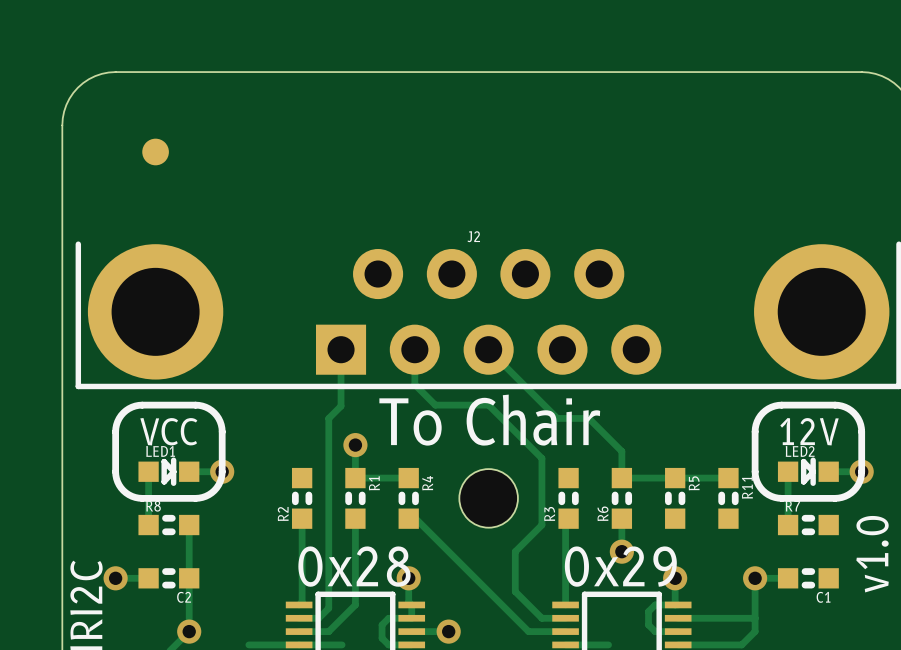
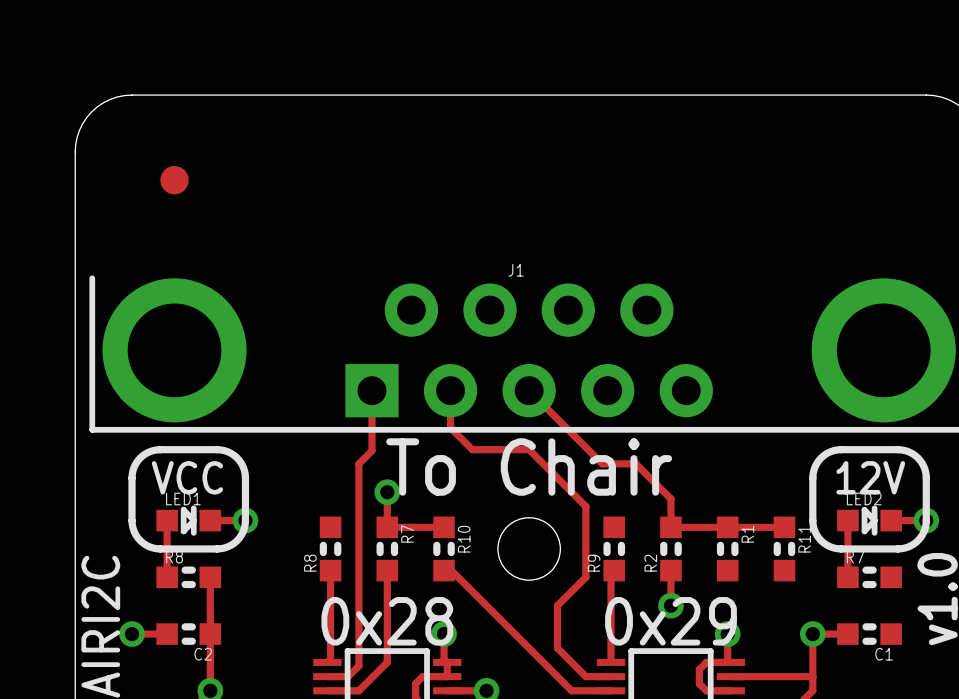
J2 name: J2 (473, 236) -> J1 (515, 270)
R1 name: R1 (374, 483) -> R7 (407, 533)
R4 name: R4 (427, 483) -> R10 (464, 539)
R5 name: R5 (694, 483) -> R1 (747, 534)
R6 name: R6 (603, 513) -> R2 (650, 563)
R2 name: R2 (283, 514) -> R8 (310, 563)
R3 name: R3 (549, 514) -> R9 (594, 563)

